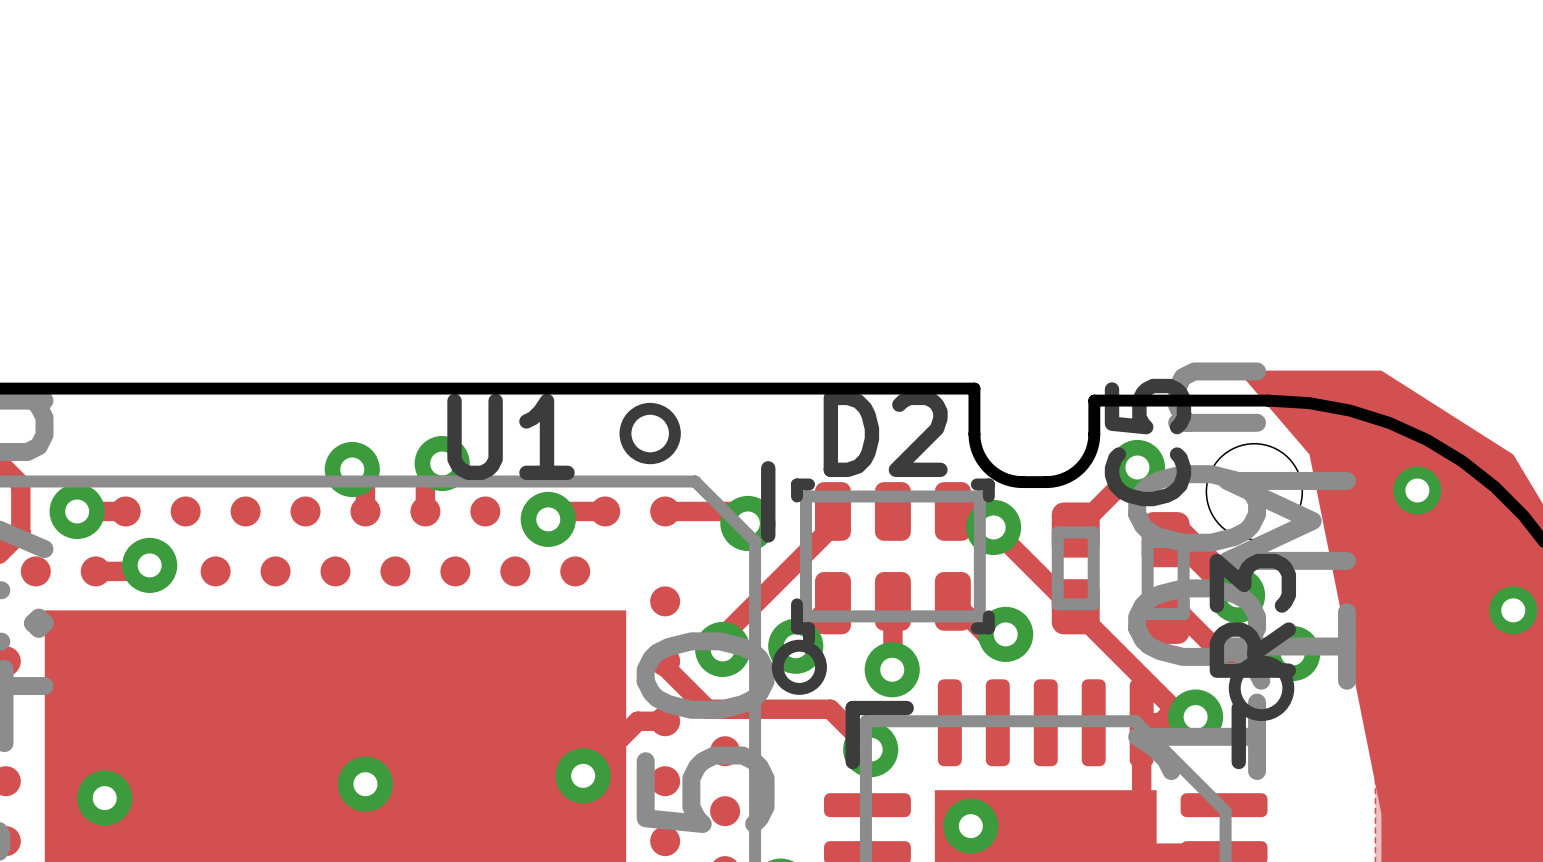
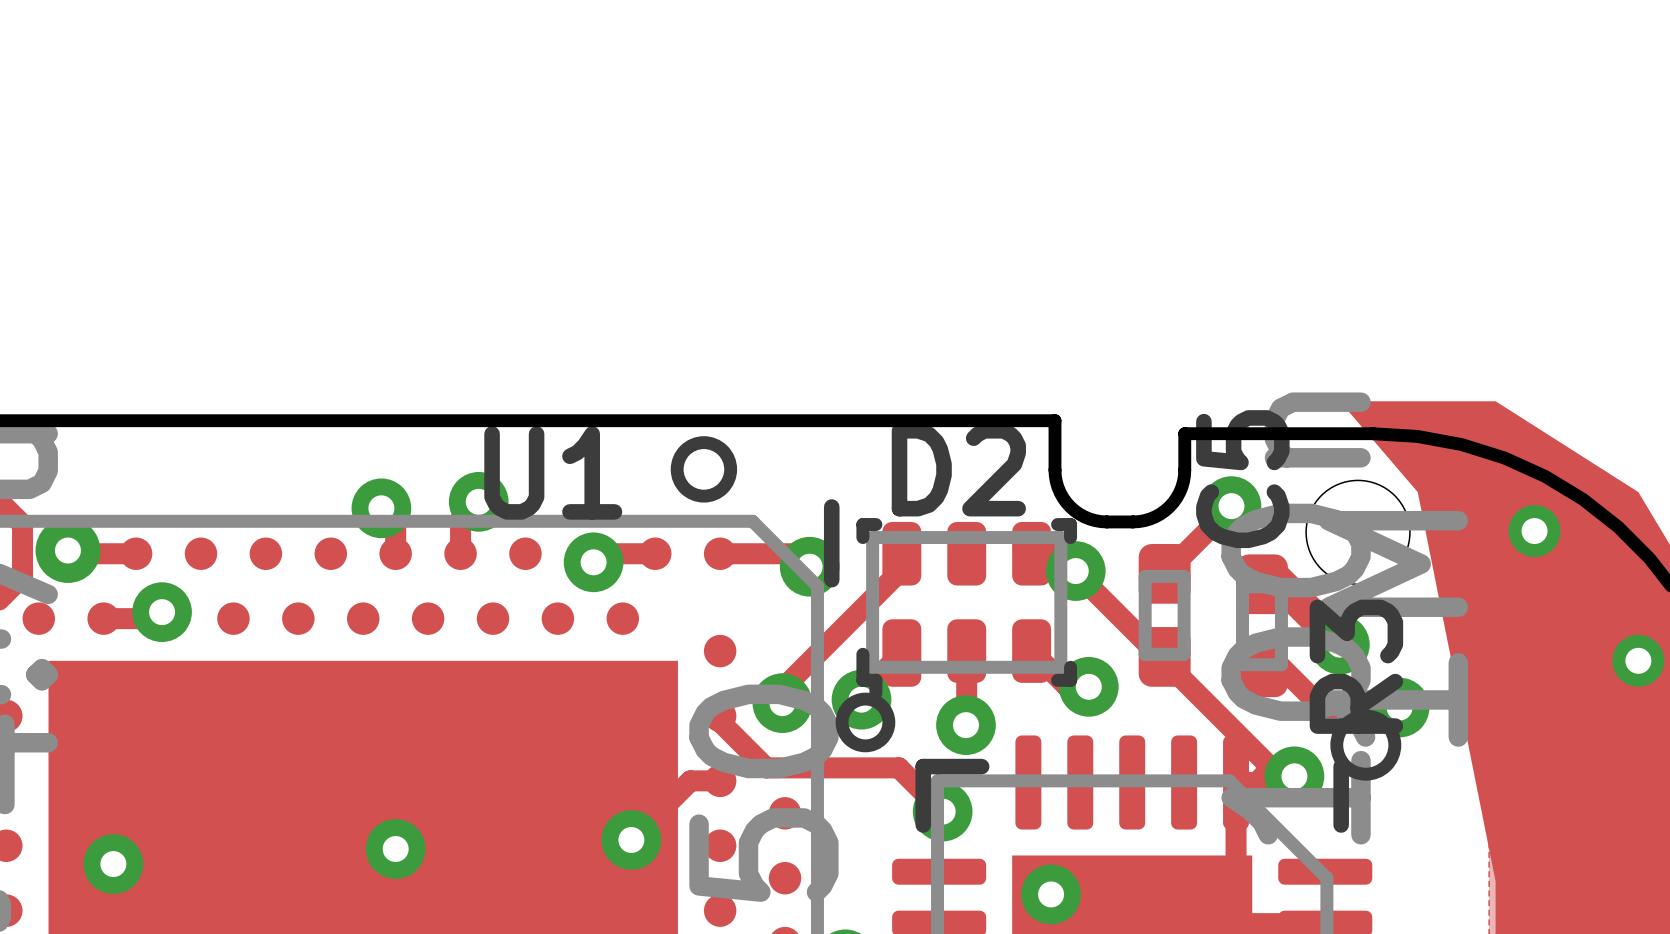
via position: (77, 511) -> (67, 550)

